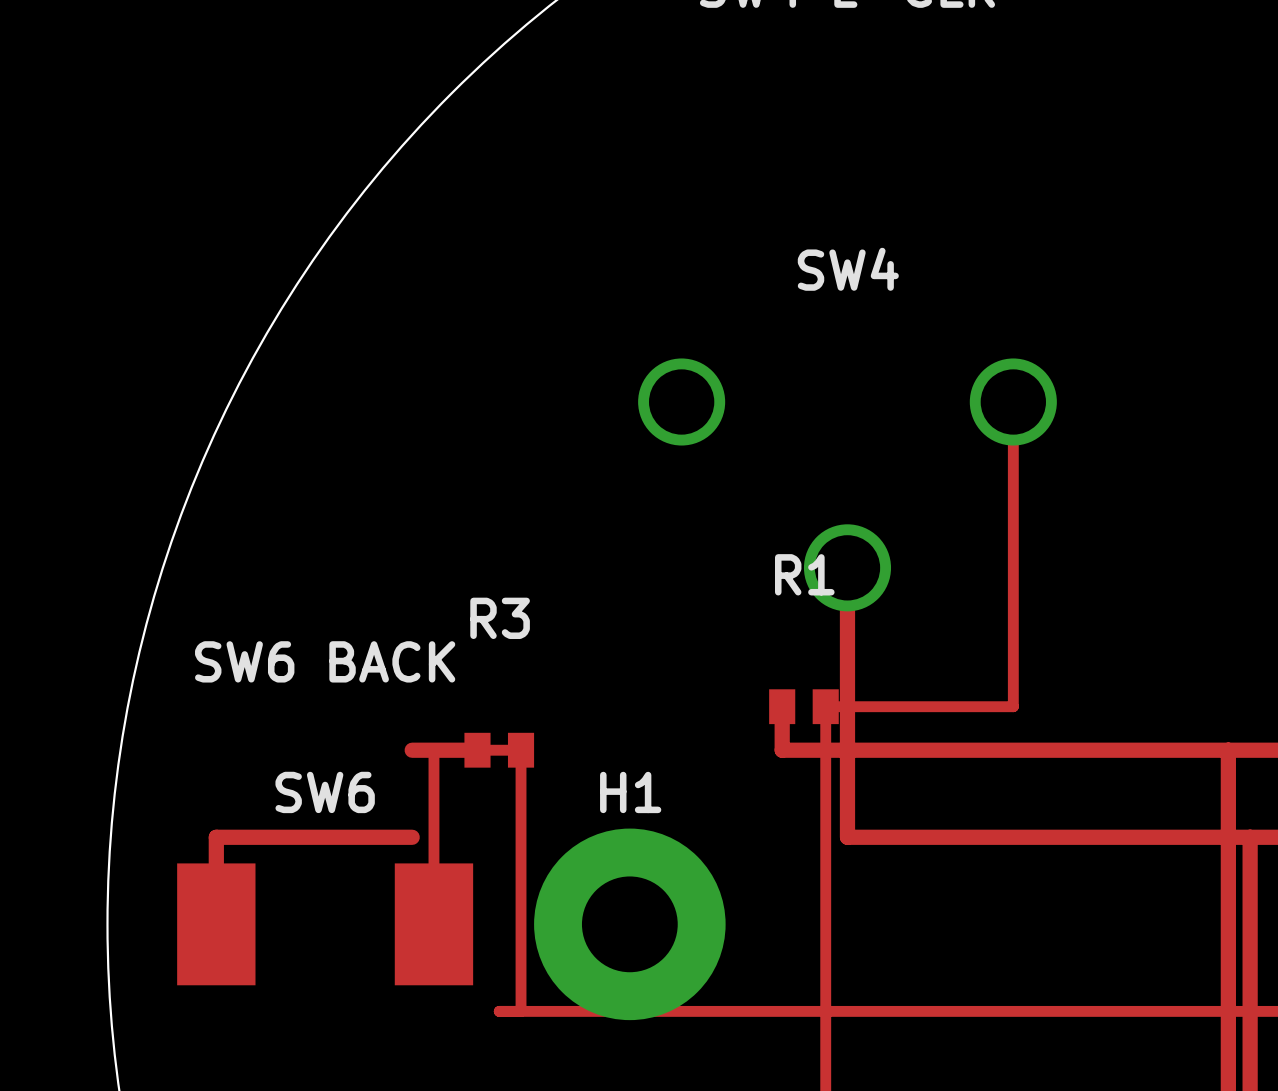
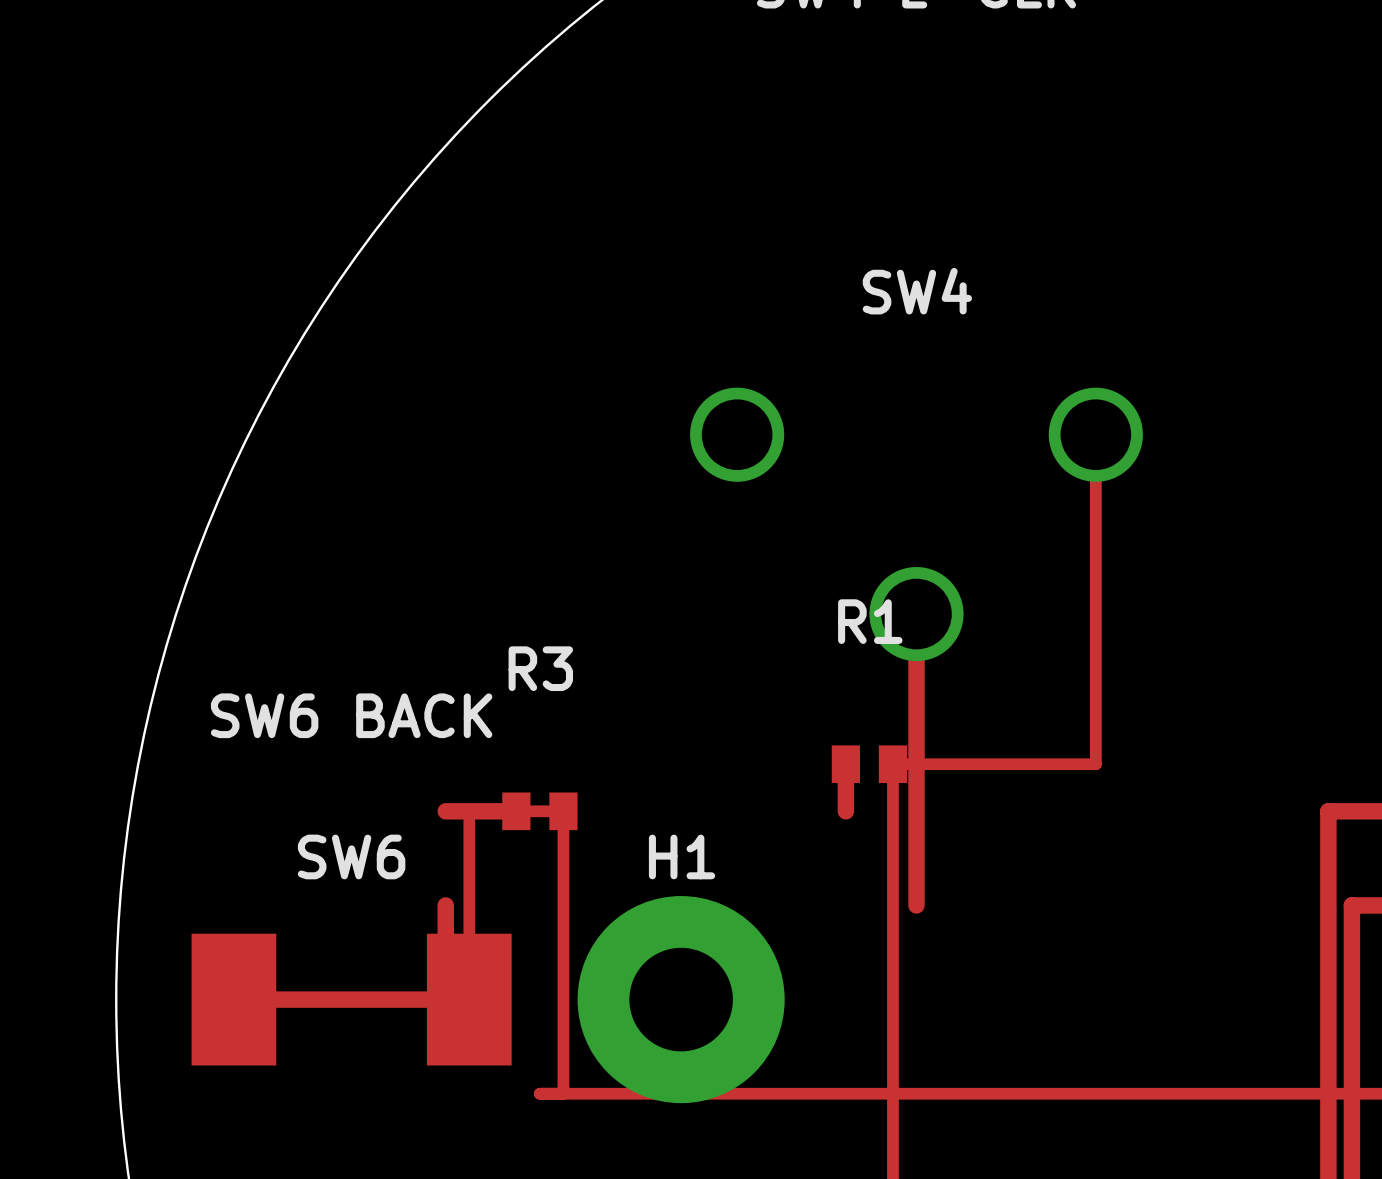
top track: (782, 750) (1228, 750) -> none
top track: (412, 837) (216, 837) (216, 924) -> (445, 905) (445, 999) (233, 999)
top track: (847, 837) (1250, 837) -> none

